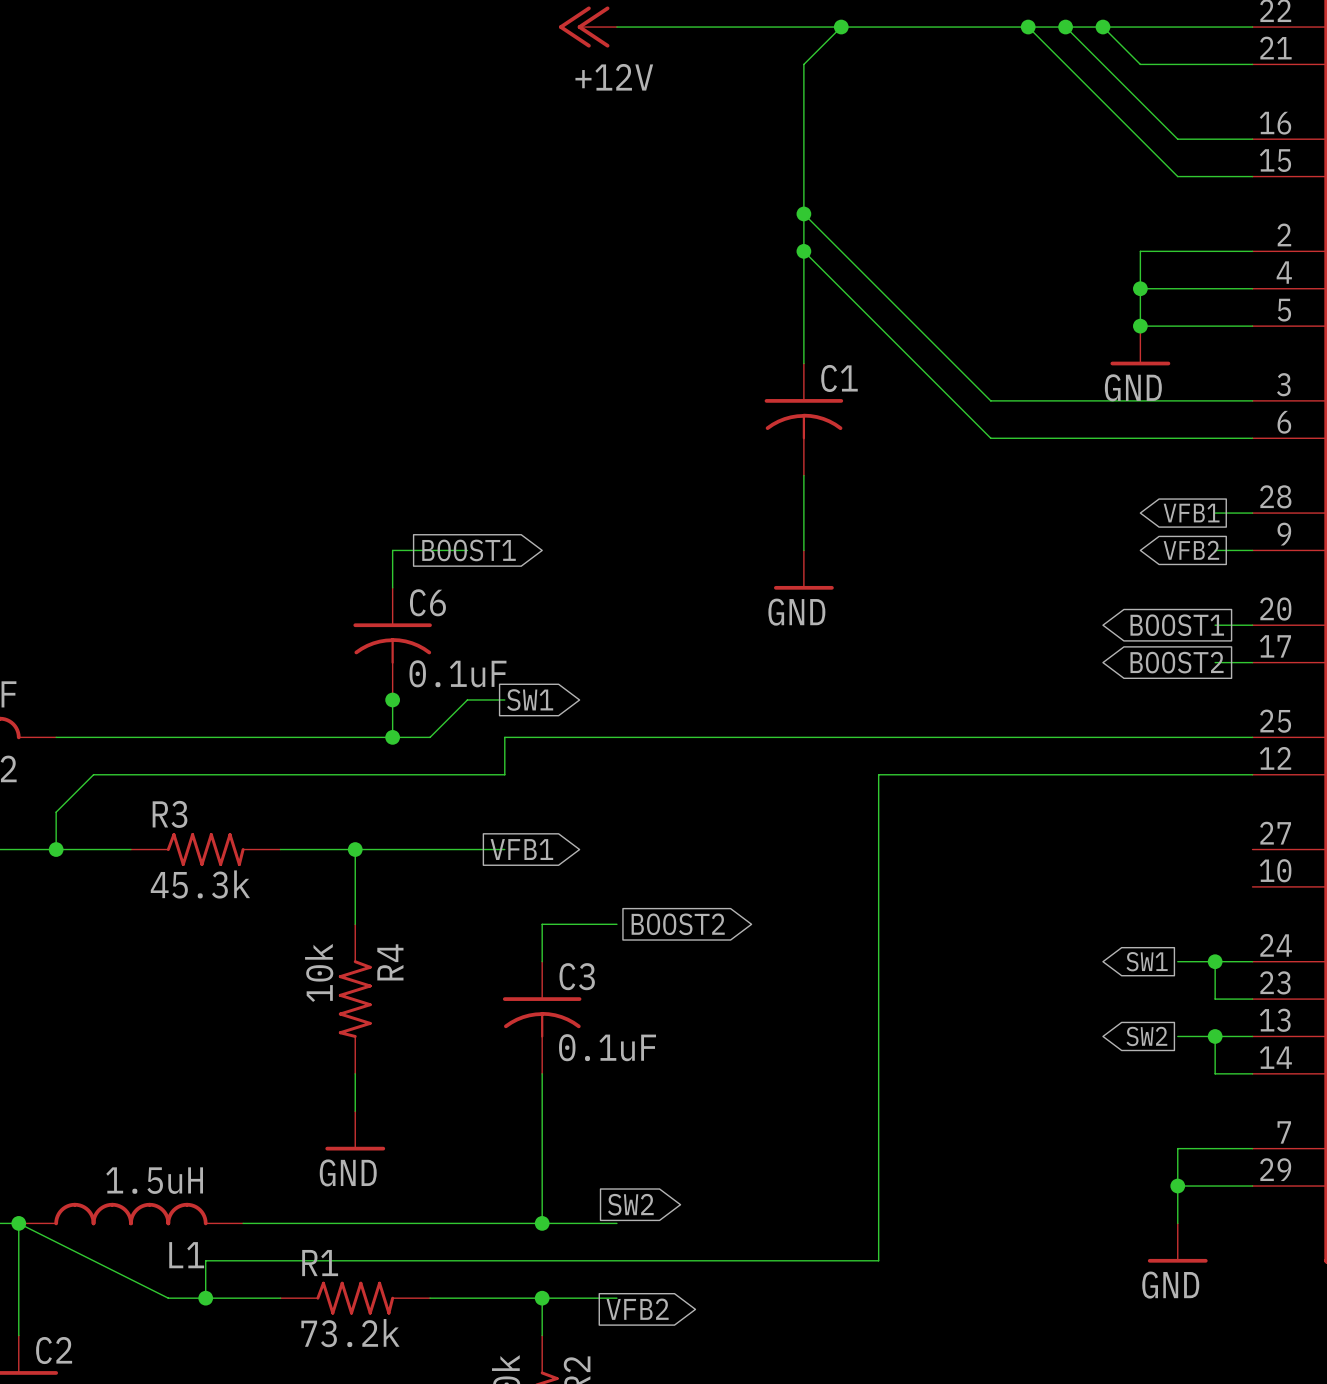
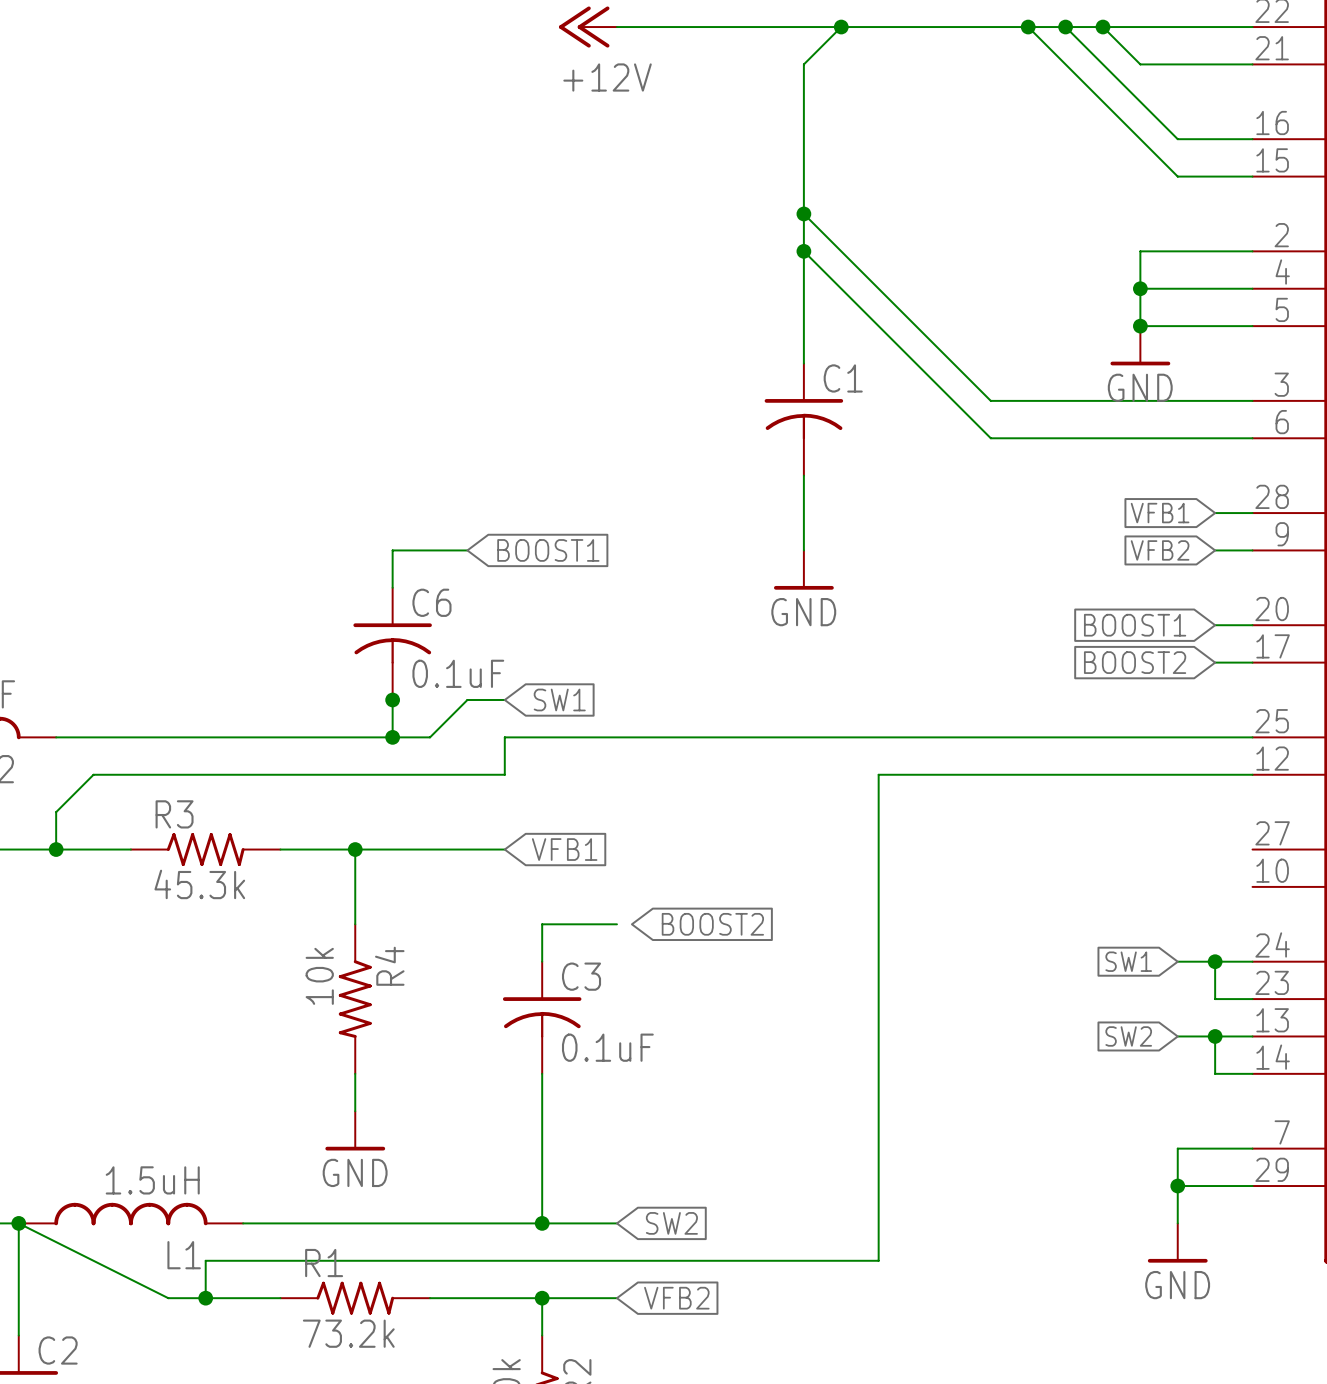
global label rotation: 0° (1191, 513) -> 180° (1160, 513)
global label rotation: 0° (469, 550) -> 180° (548, 550)
global label rotation: 0° (1191, 550) -> 180° (1160, 550)
global label rotation: 0° (1177, 625) -> 180° (1135, 625)
global label rotation: 0° (1177, 662) -> 180° (1135, 662)
global label rotation: 0° (530, 699) -> 180° (559, 699)
global label rotation: 0° (521, 849) -> 180° (564, 849)
global label rotation: 0° (678, 924) -> 180° (712, 924)
global label rotation: 0° (1147, 961) -> 180° (1128, 961)
global label rotation: 0° (1146, 1036) -> 180° (1128, 1036)
global label rotation: 0° (630, 1204) -> 180° (671, 1223)
global label rotation: 0° (637, 1309) -> 180° (676, 1298)

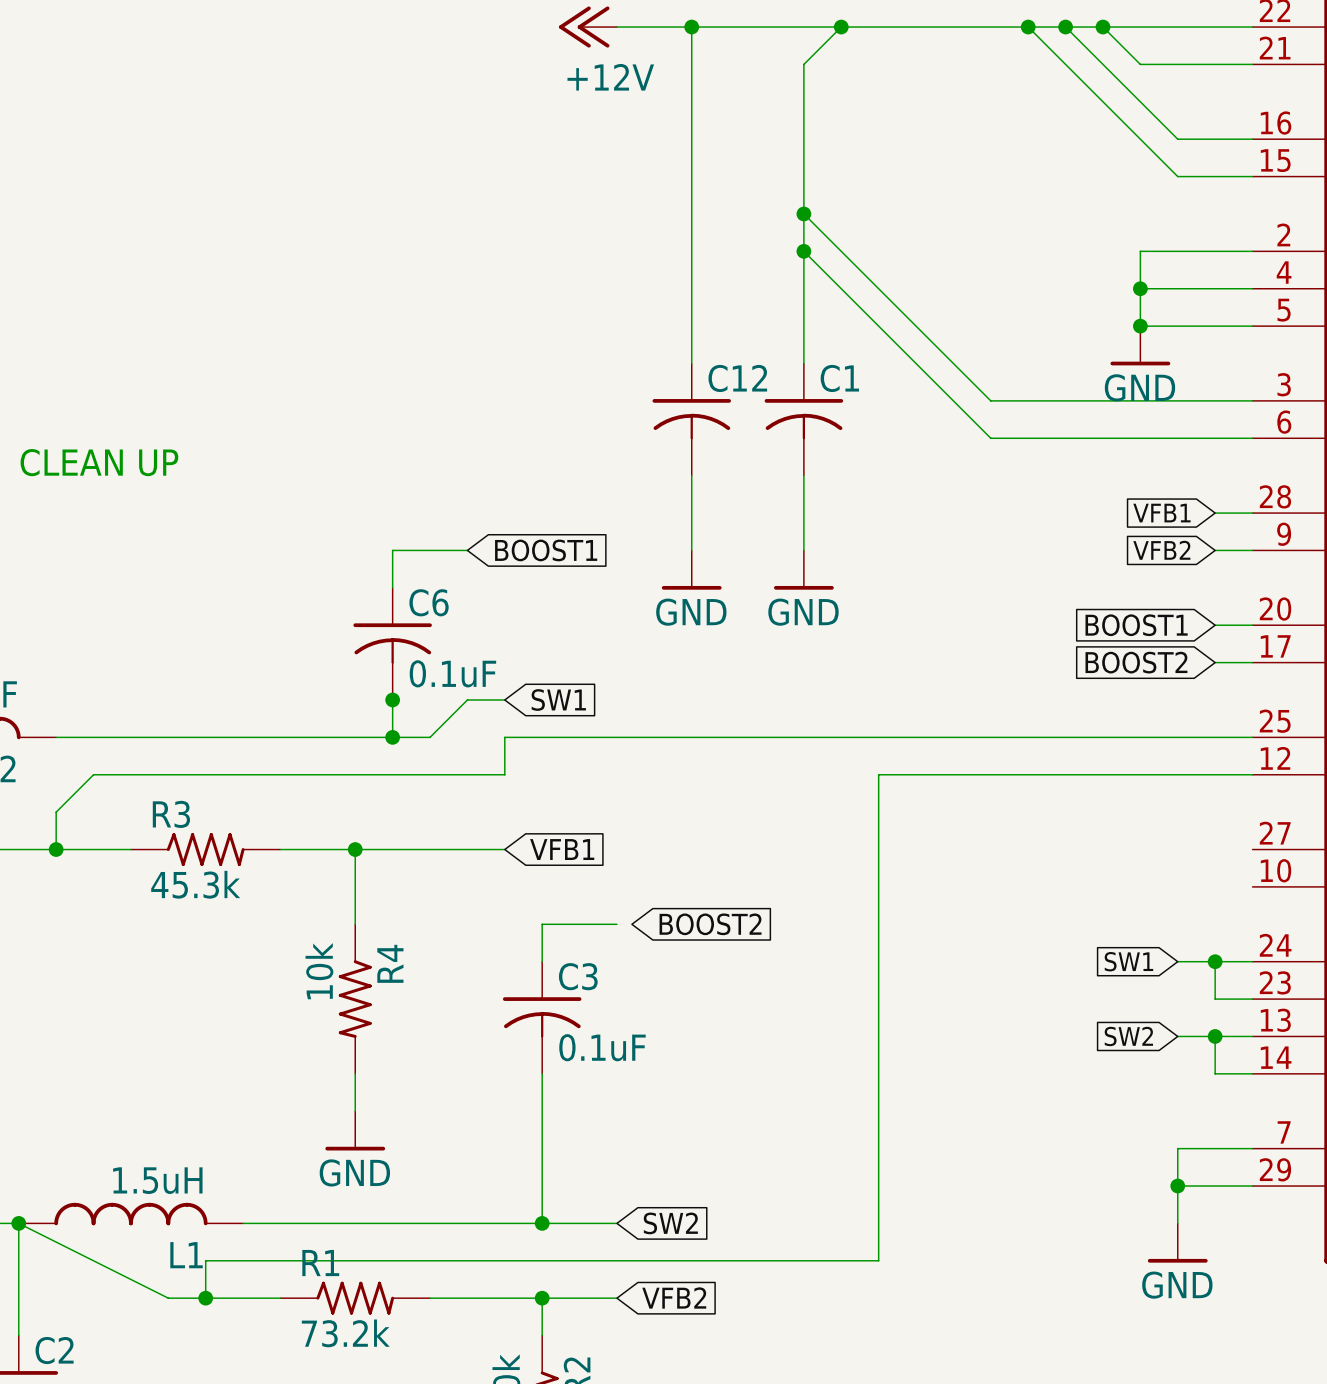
wire: none -> (691, 27) (691, 363)
junction: none -> (691, 27)
C12: none -> (691, 419)
text: none -> CLEAN UP (99, 462)
wire: none -> (691, 475) (691, 550)
power symbol: none -> GND (691, 570)

